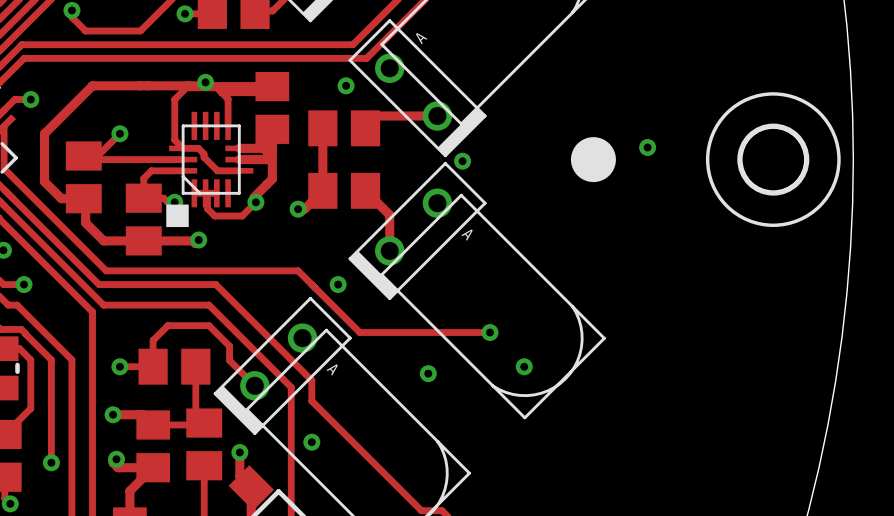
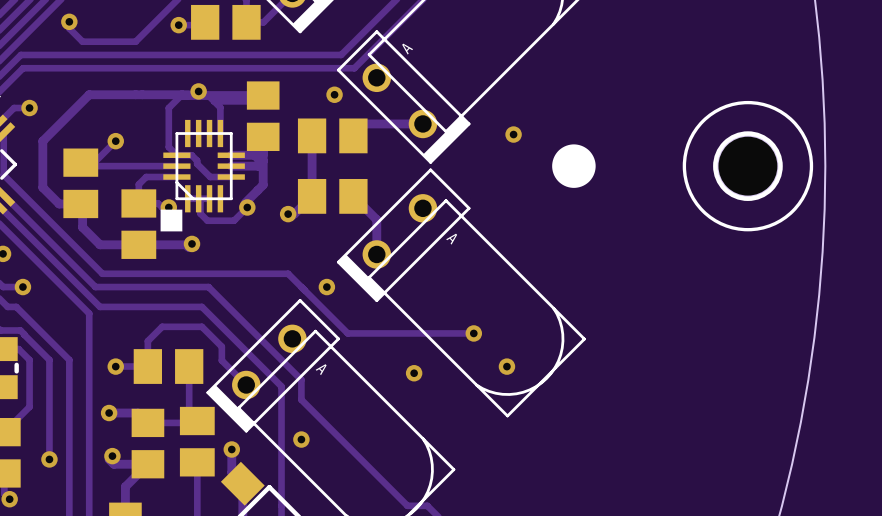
via: none -> (513, 134)
via: (647, 147) -> none
via: (462, 161) -> none

